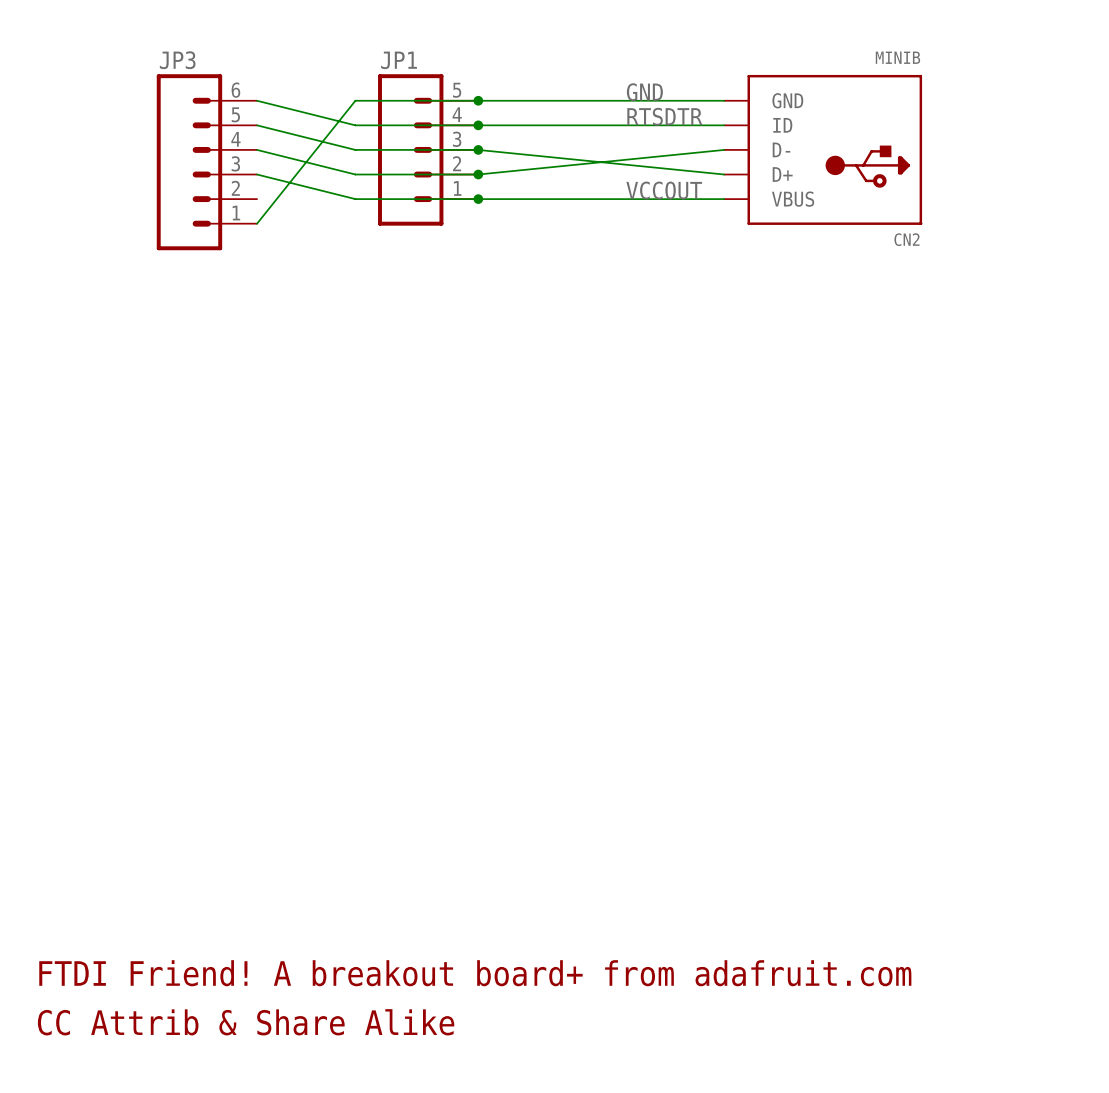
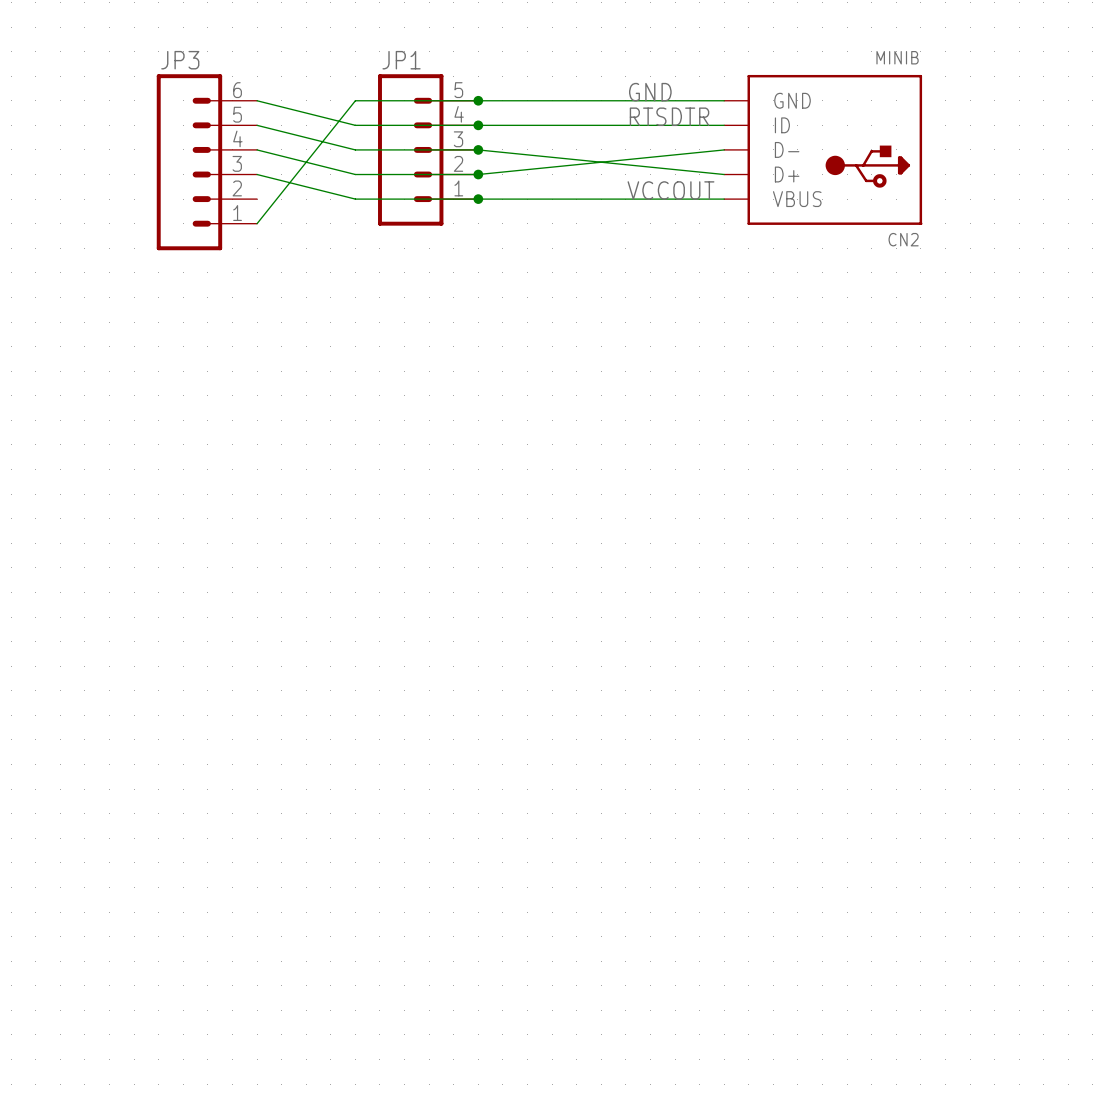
text: FTDI Friend! A breakout board+ from adafruit.com (475, 973) -> none
text: CC Attrib & Share Alike (246, 1022) -> none

